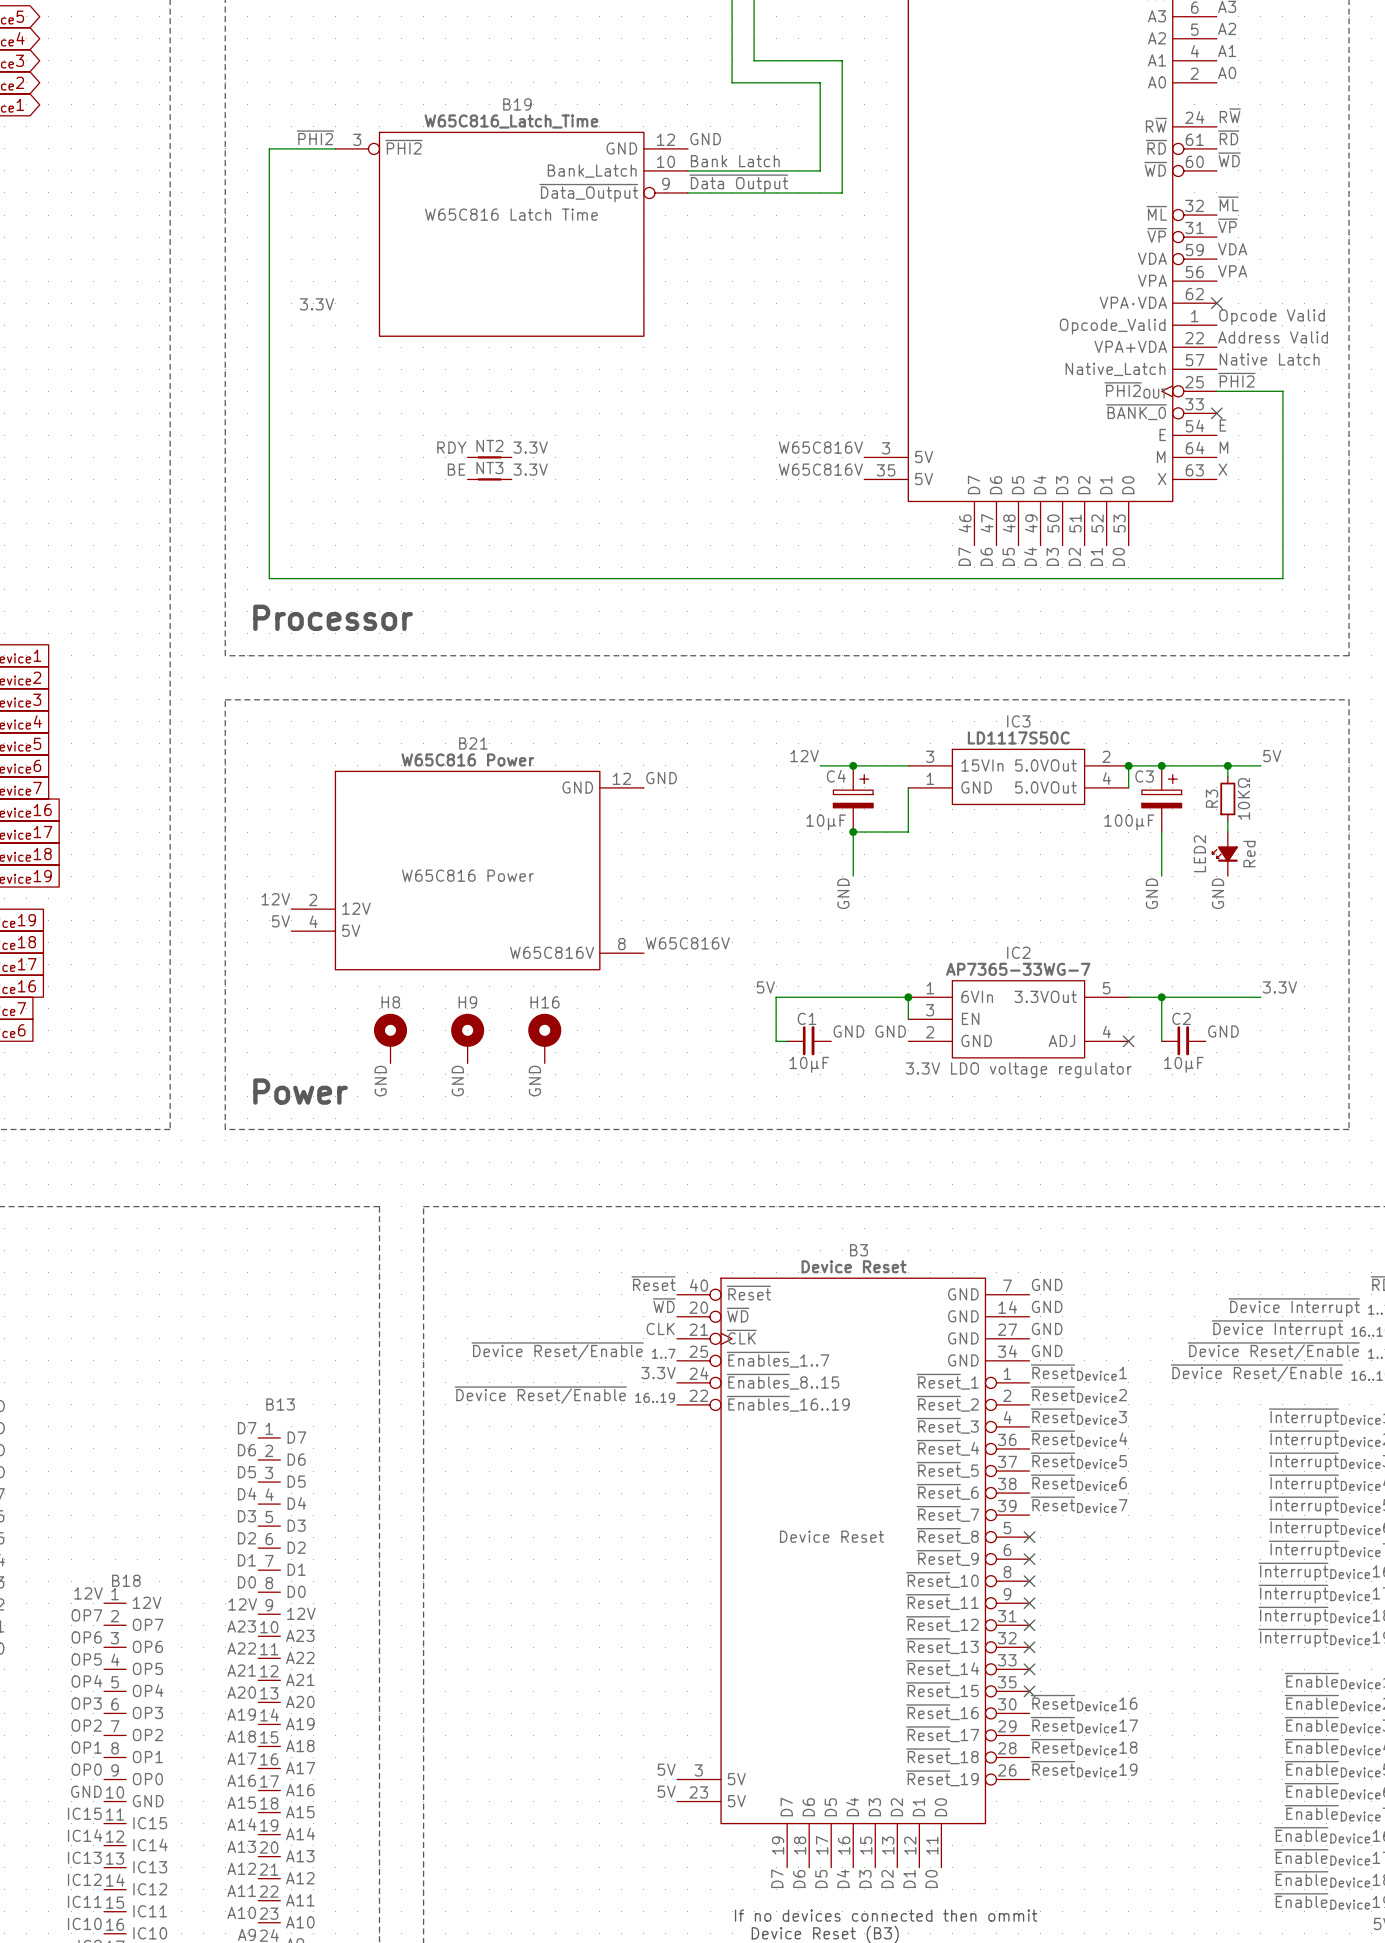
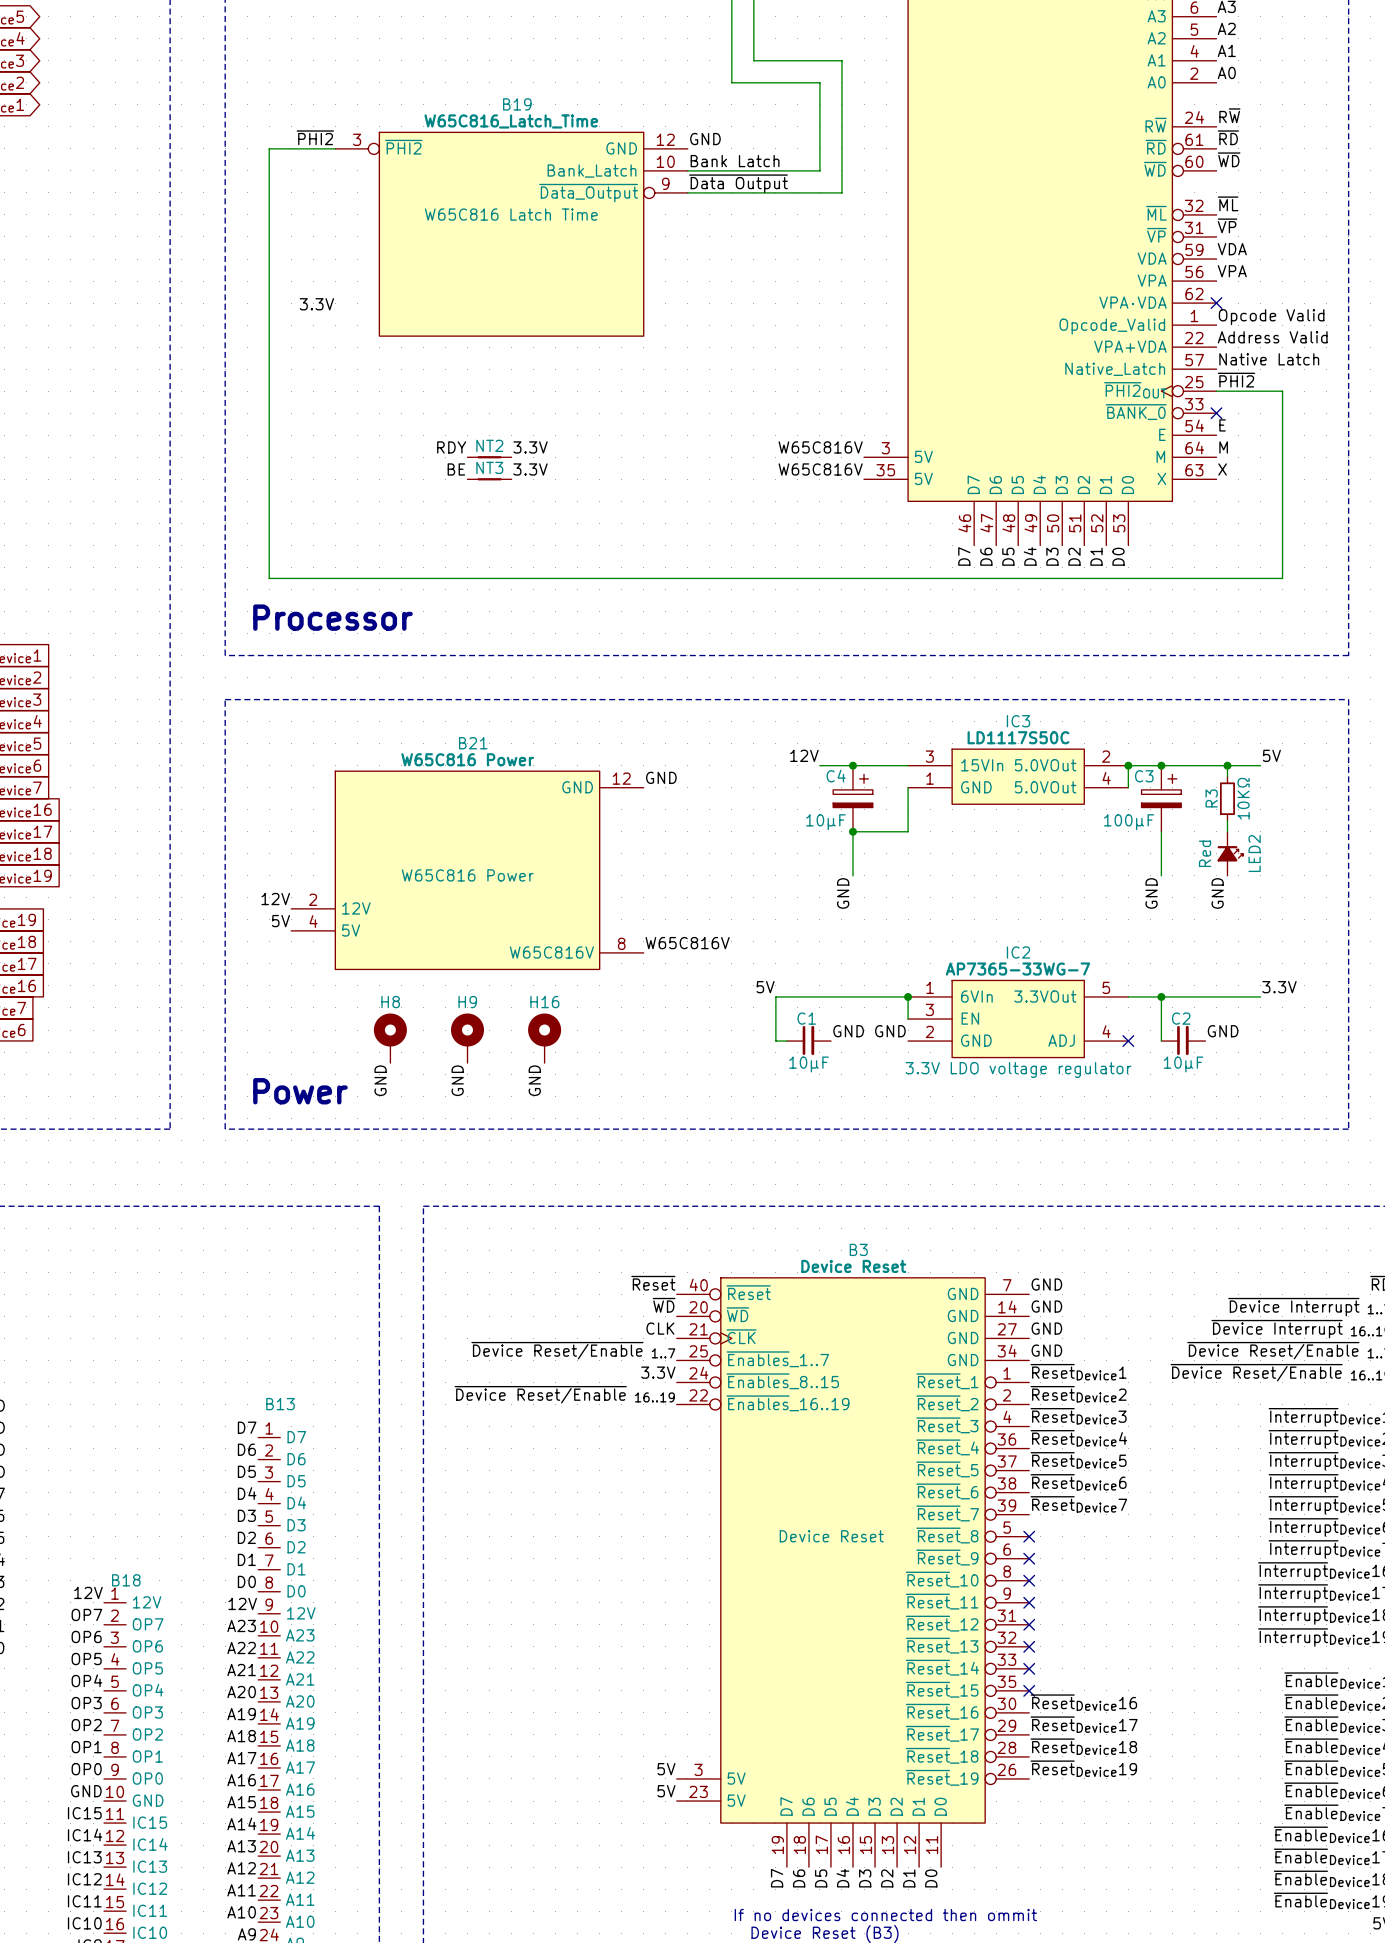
LED2 rotation: 0° (1225, 854) -> 180° (1230, 853)

